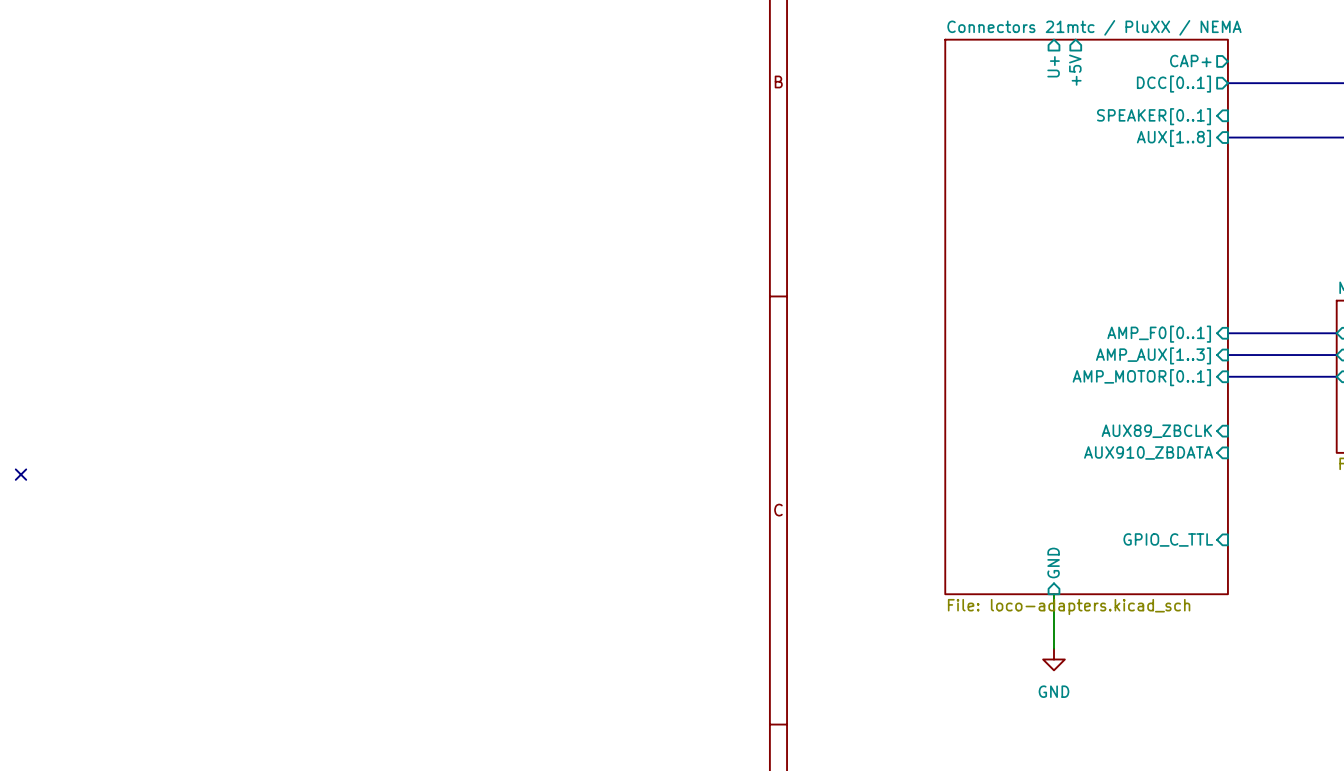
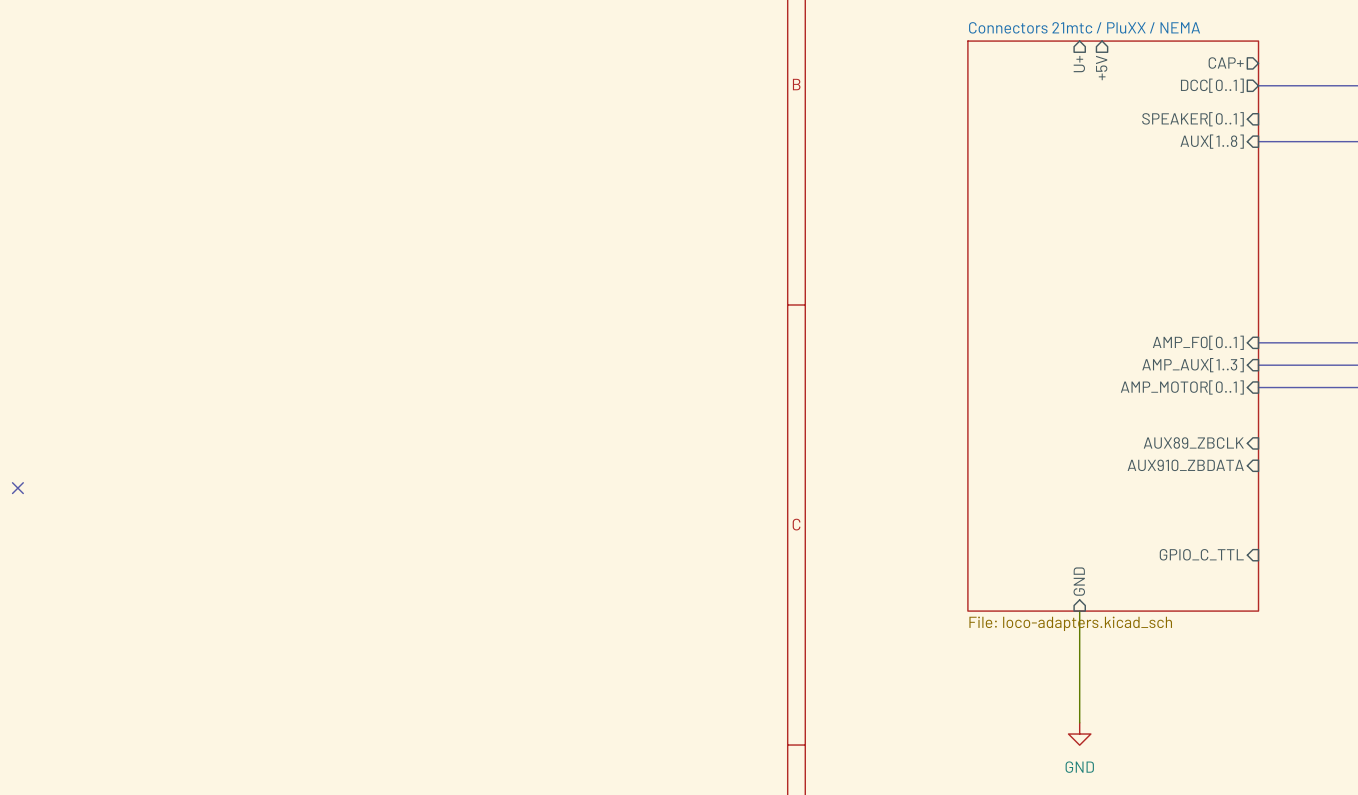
wire: none -> (1079, 666) (1079, 722)
power symbol position: GND (1053, 659) -> GND (1079, 734)

